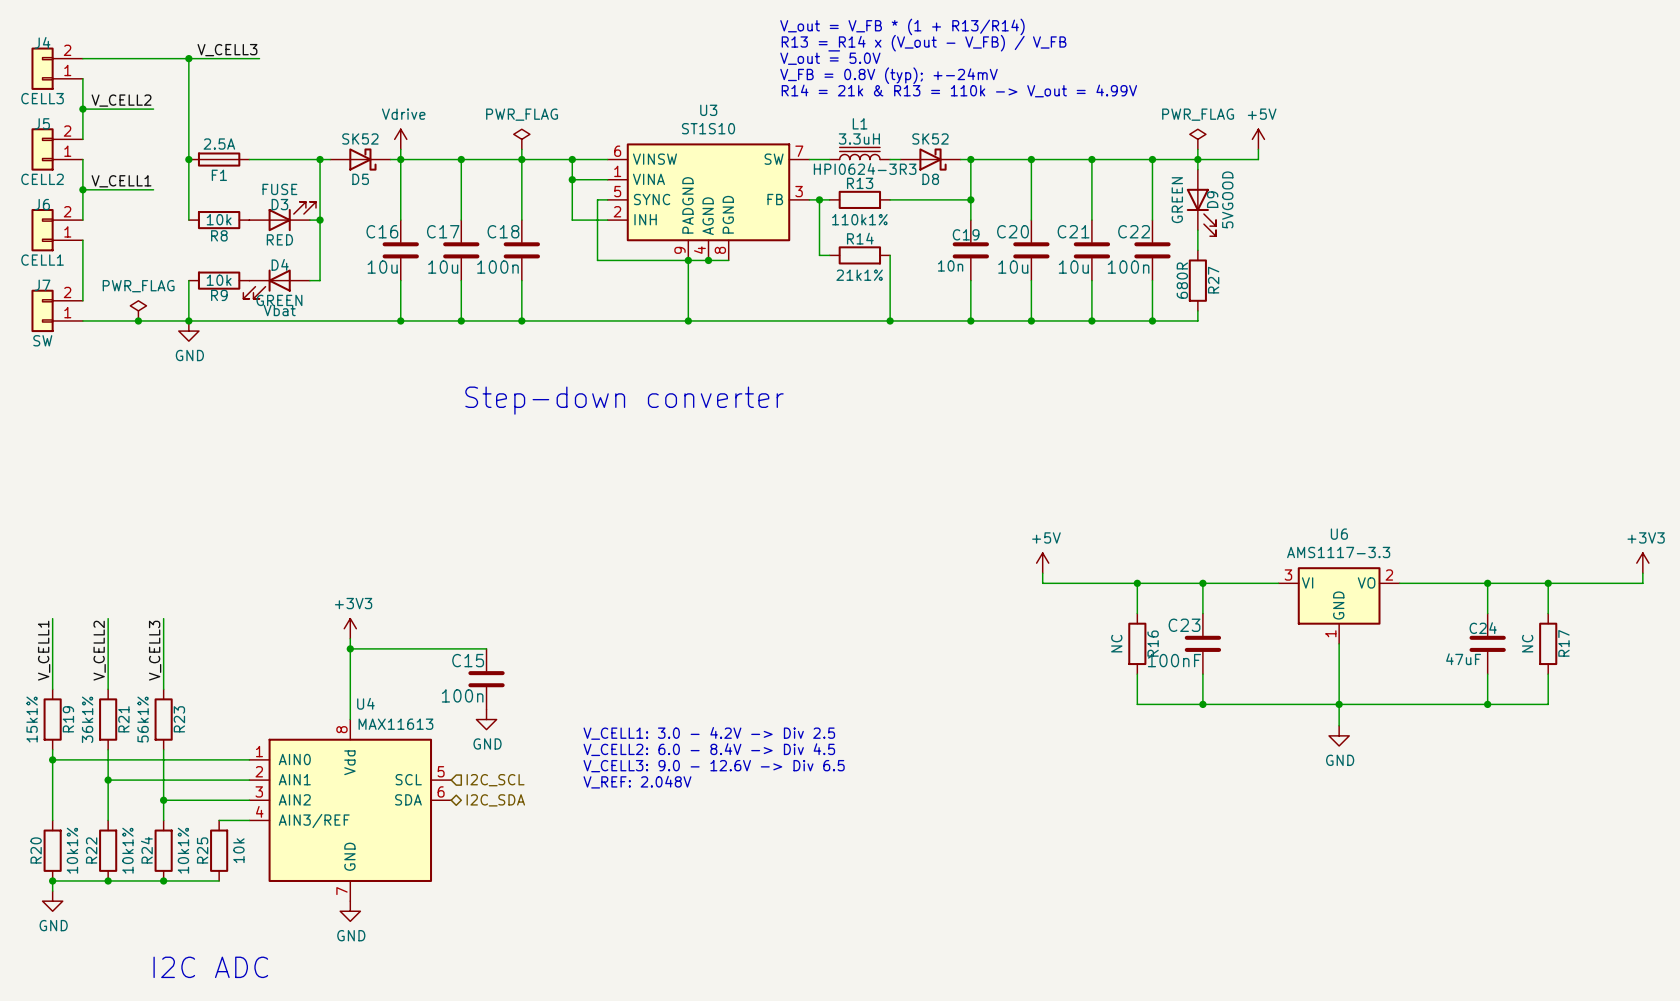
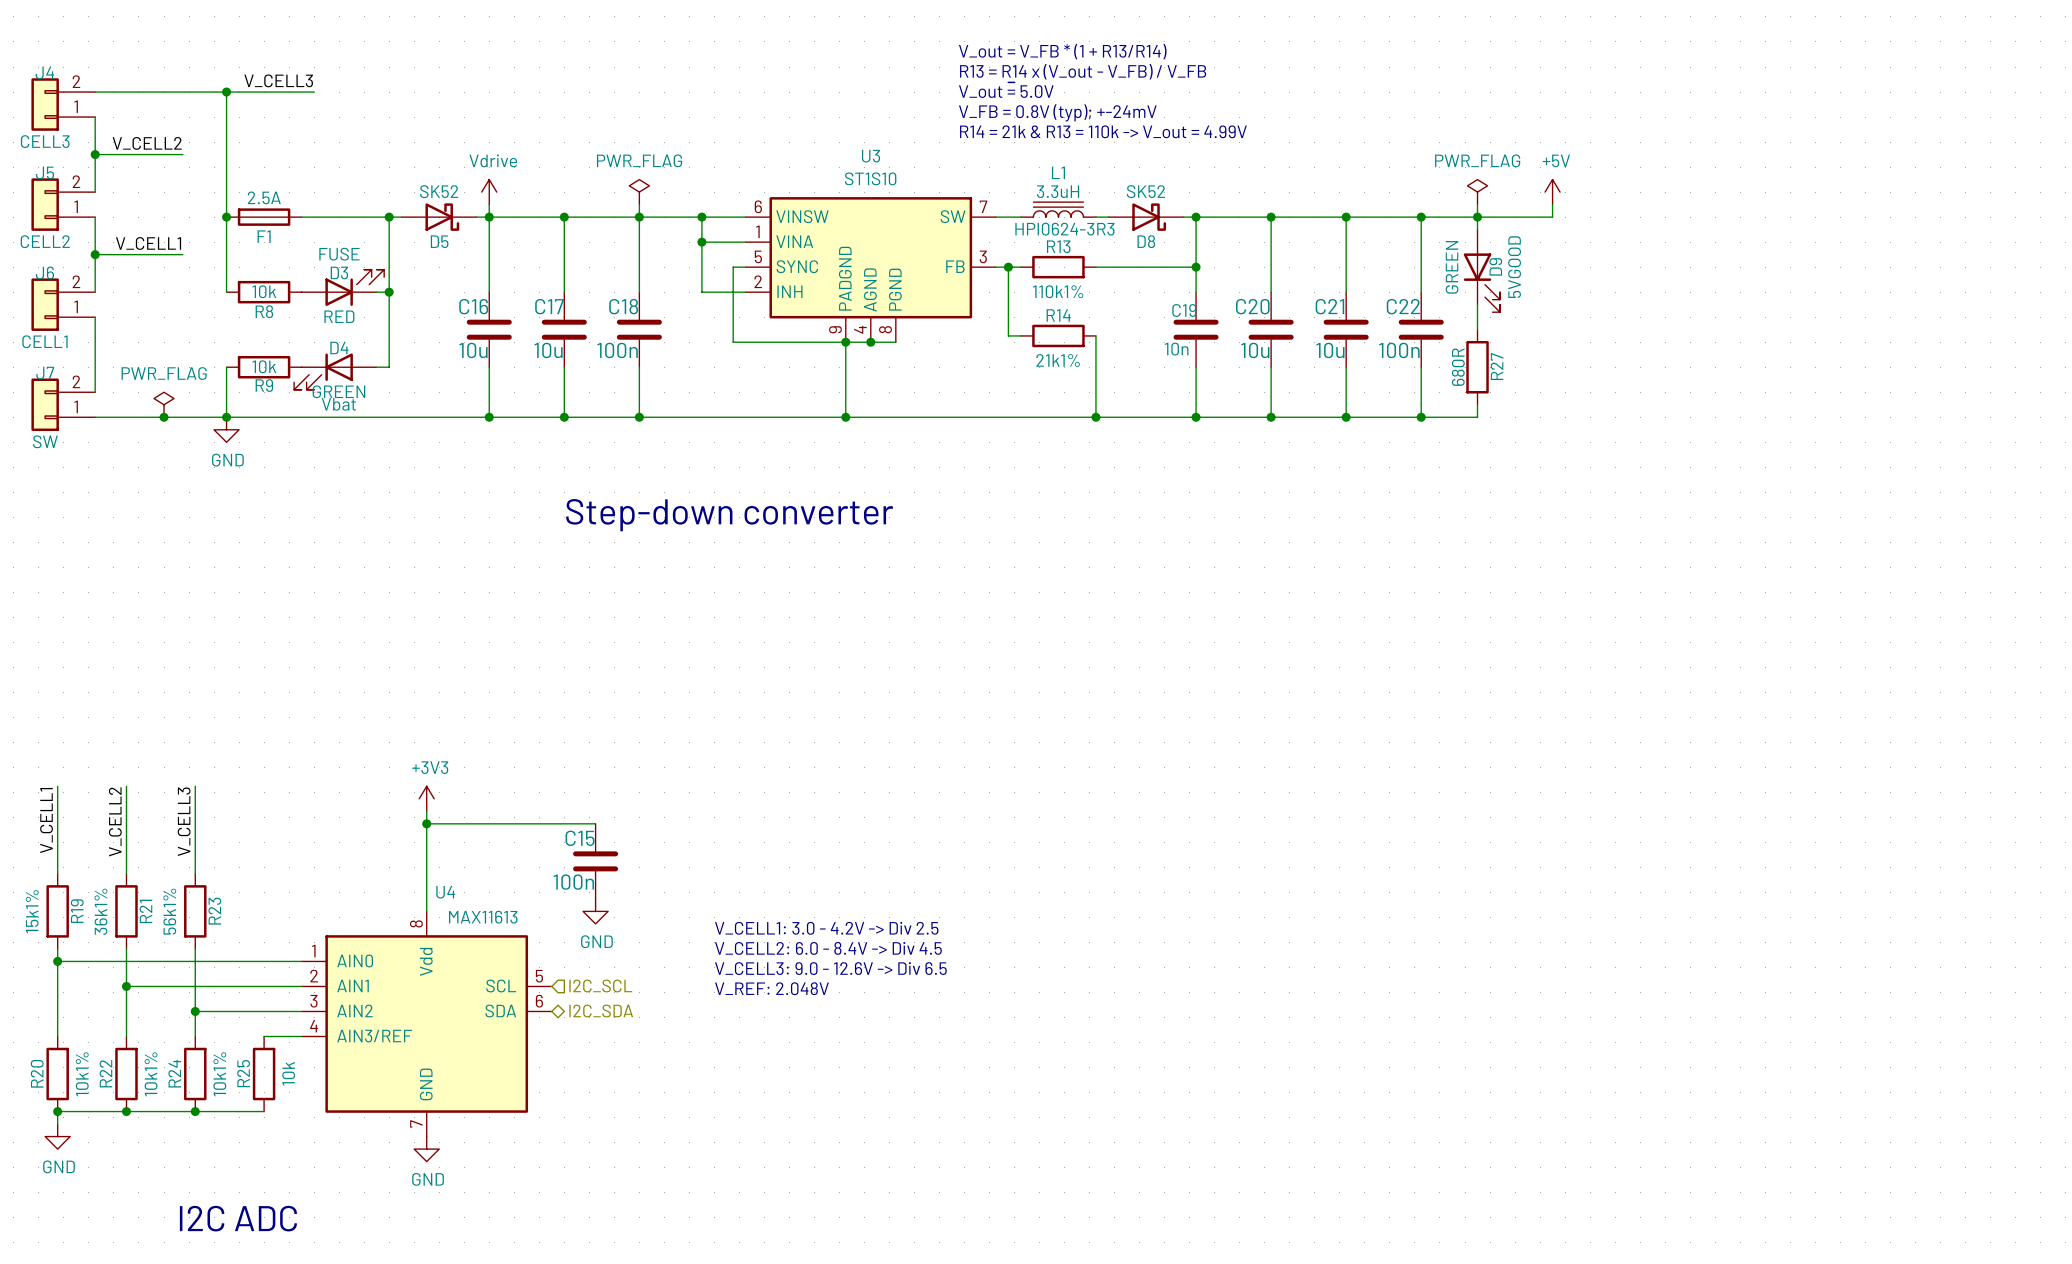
power symbol: +5V (1042, 563) -> none
power symbol: +3V3 (1642, 563) -> none
wire: (1042, 573) (1042, 583) (1278, 583) -> none
wire: (1642, 573) (1642, 583) (1399, 583) -> none
wire: (1137, 583) (1137, 613) -> none
junction: (1137, 583) -> none
wire: (1202, 583) (1202, 613) -> none
junction: (1202, 583) -> none
wire: (1487, 583) (1487, 613) -> none
junction: (1487, 583) -> none
wire: (1548, 583) (1548, 613) -> none
junction: (1548, 583) -> none
U6: AMS1117-3.3 (1339, 605) -> none
R16: NC (1137, 643) -> none
C23: 100nF (1202, 643) -> none
wire: (1339, 643) (1339, 725) -> none
C24: 47uF (1487, 643) -> none
R17: NC (1548, 643) -> none
wire: (1137, 674) (1137, 704) (1548, 704) (1548, 674) -> none
wire: (1202, 674) (1202, 704) -> none
wire: (1487, 674) (1487, 704) -> none
junction: (1202, 704) -> none
junction: (1339, 704) -> none
junction: (1487, 704) -> none
power symbol: GND (1339, 735) -> none

